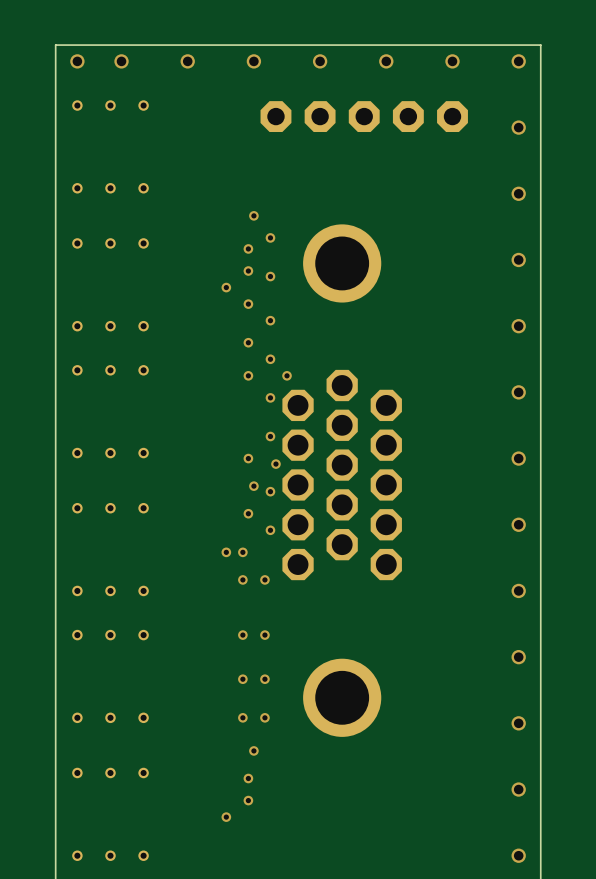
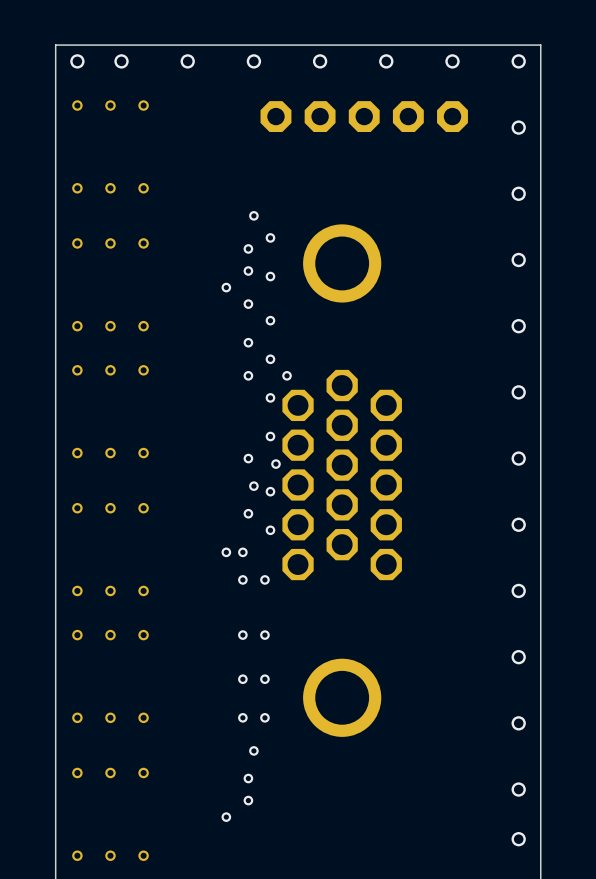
via: none -> (518, 839)
via: (518, 855) -> none

